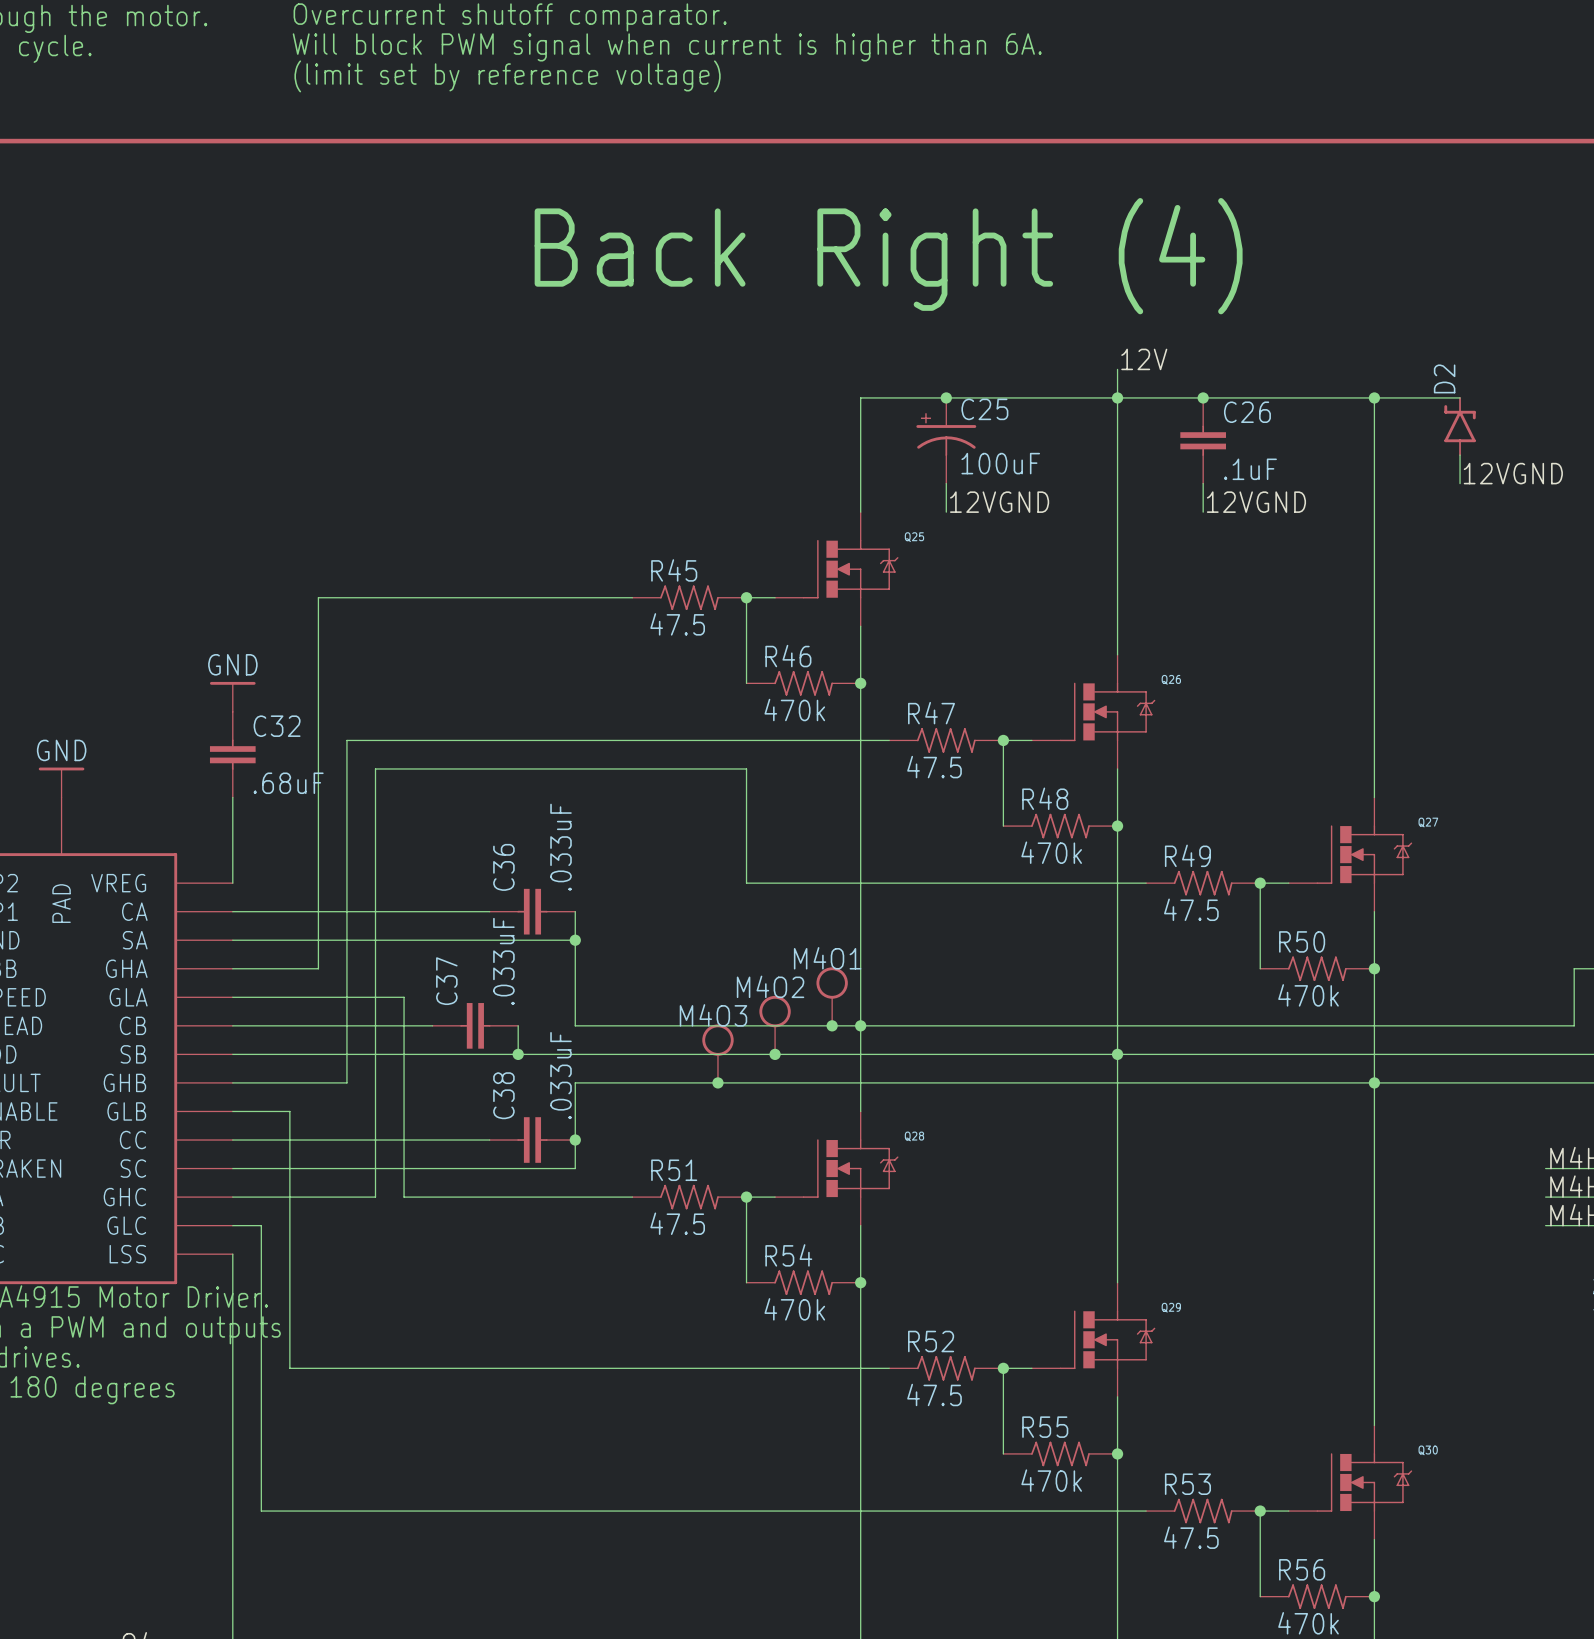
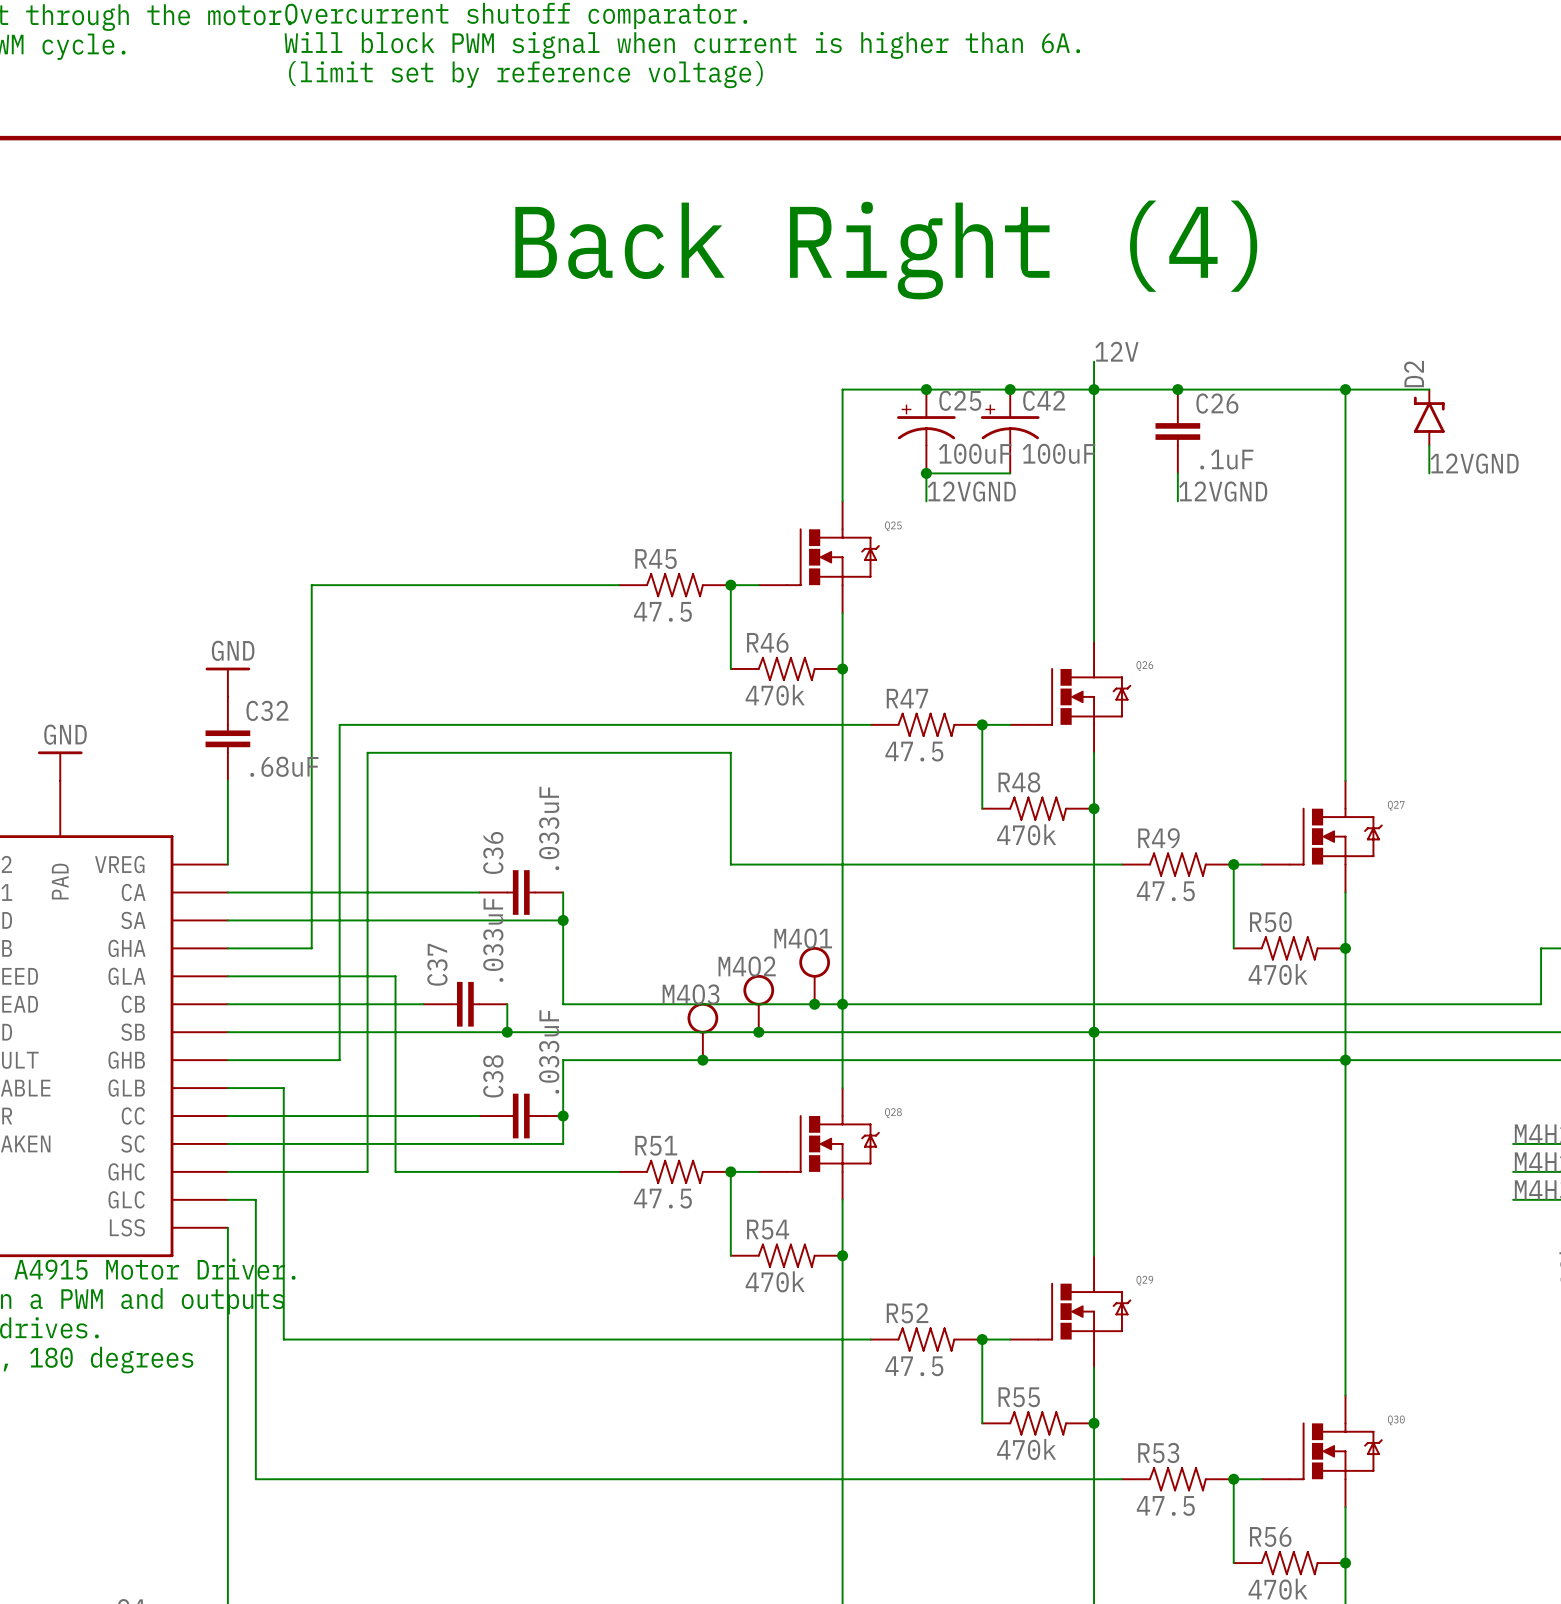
junction: none -> (1010, 389)
C42: none -> 100uF (1010, 431)
wire: none -> (926, 473) (1010, 473)
junction: none -> (926, 473)

